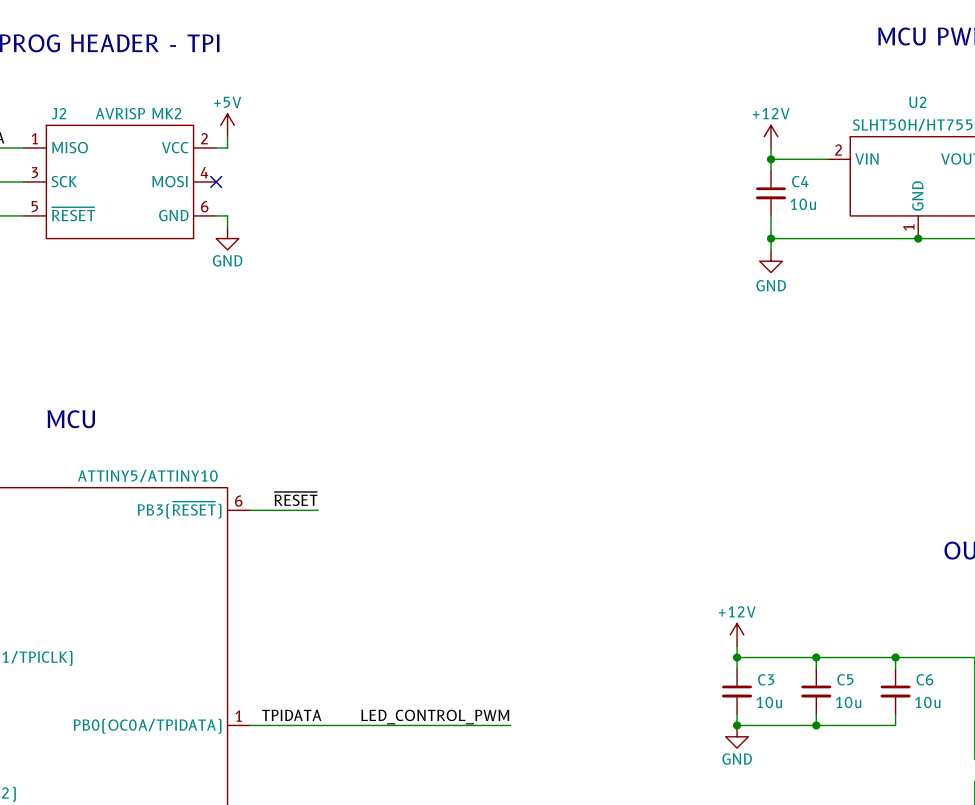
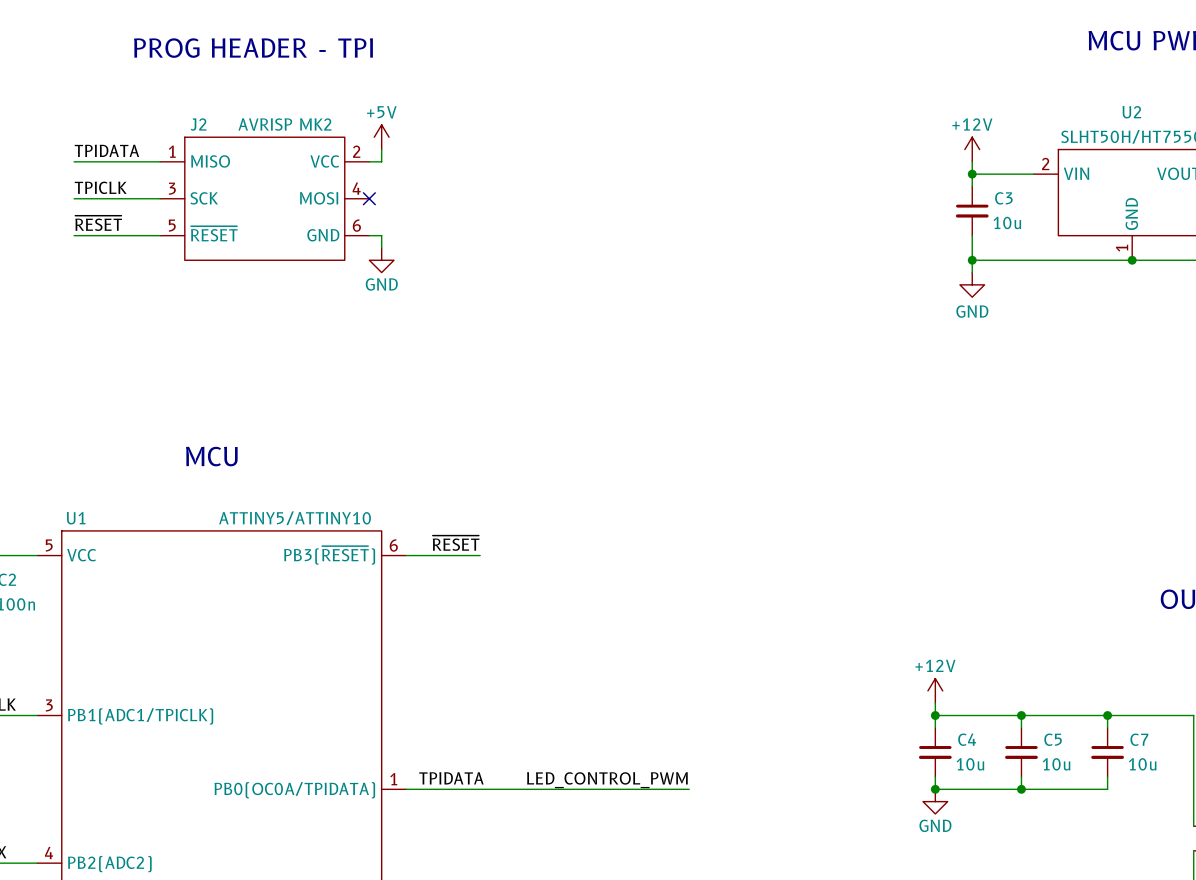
C4 name: C4 (800, 181) -> C3 (1003, 198)
C3 name: C3 (766, 679) -> C4 (967, 739)
C6 name: C6 (924, 679) -> C7 (1139, 739)

